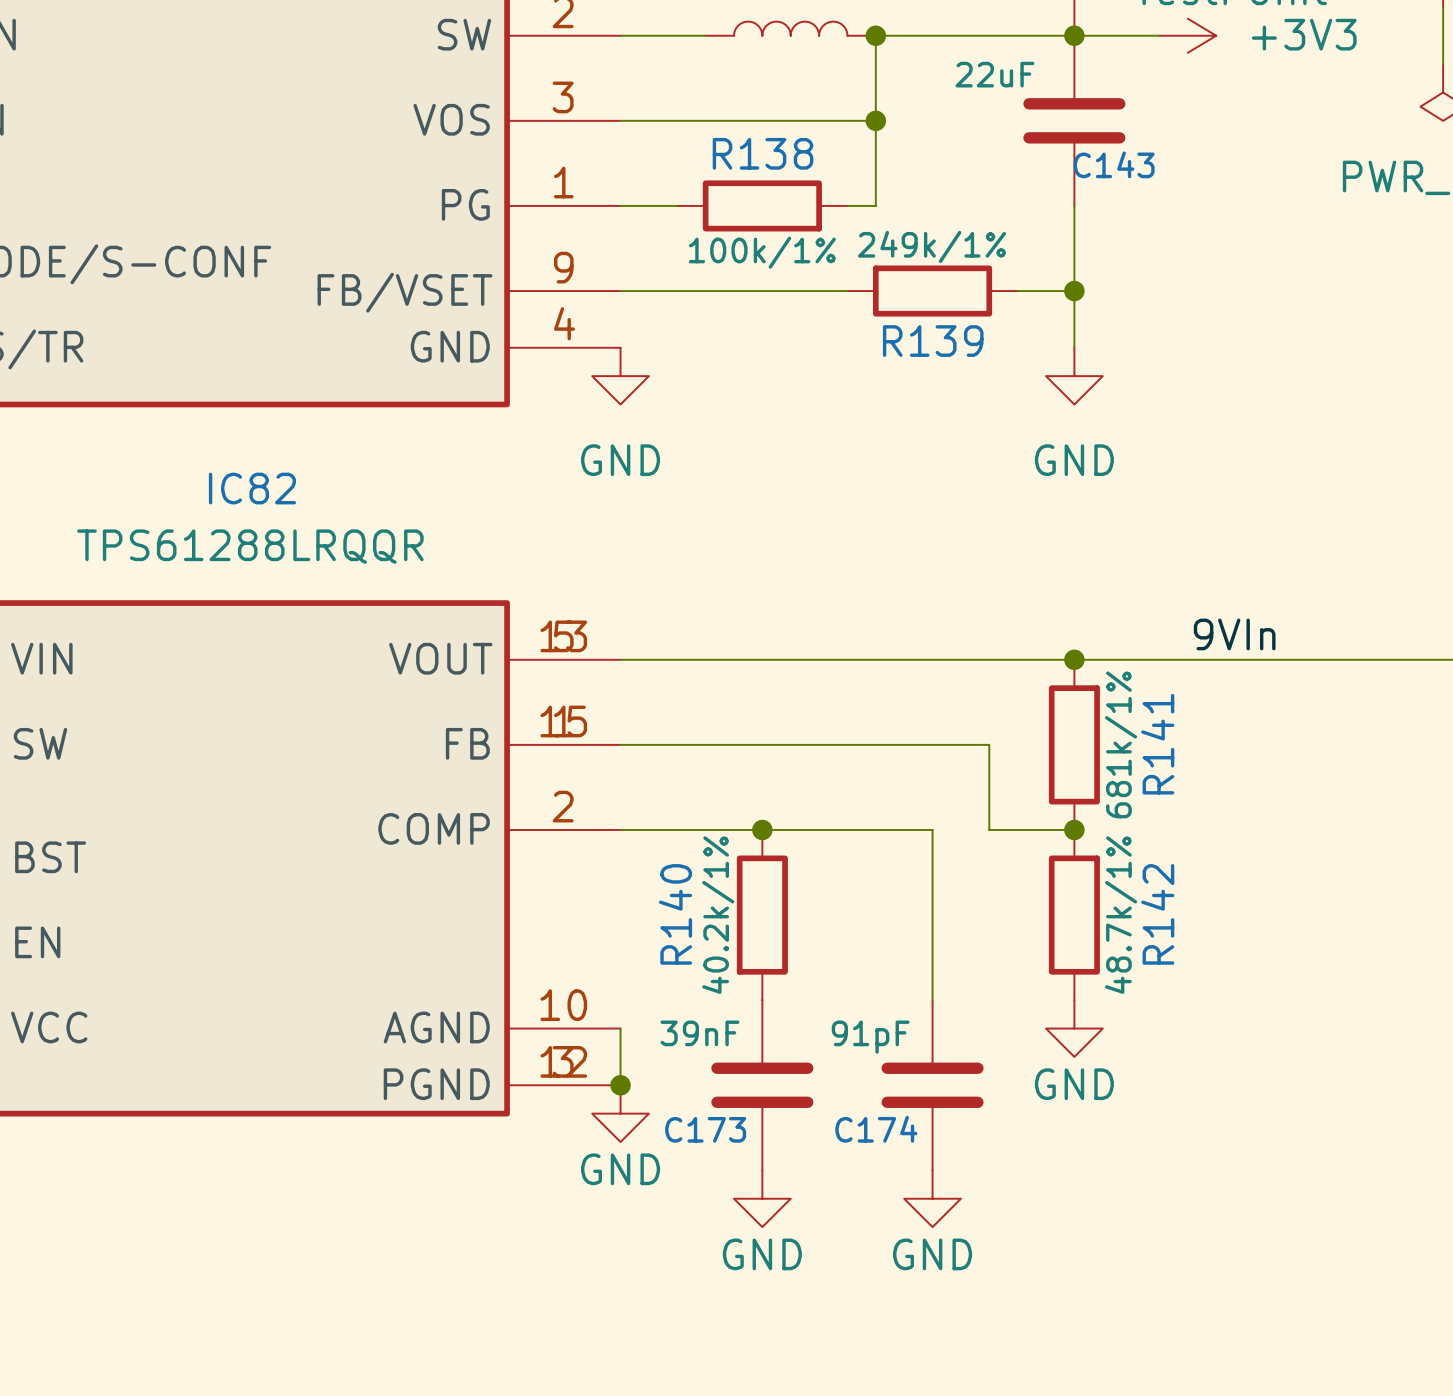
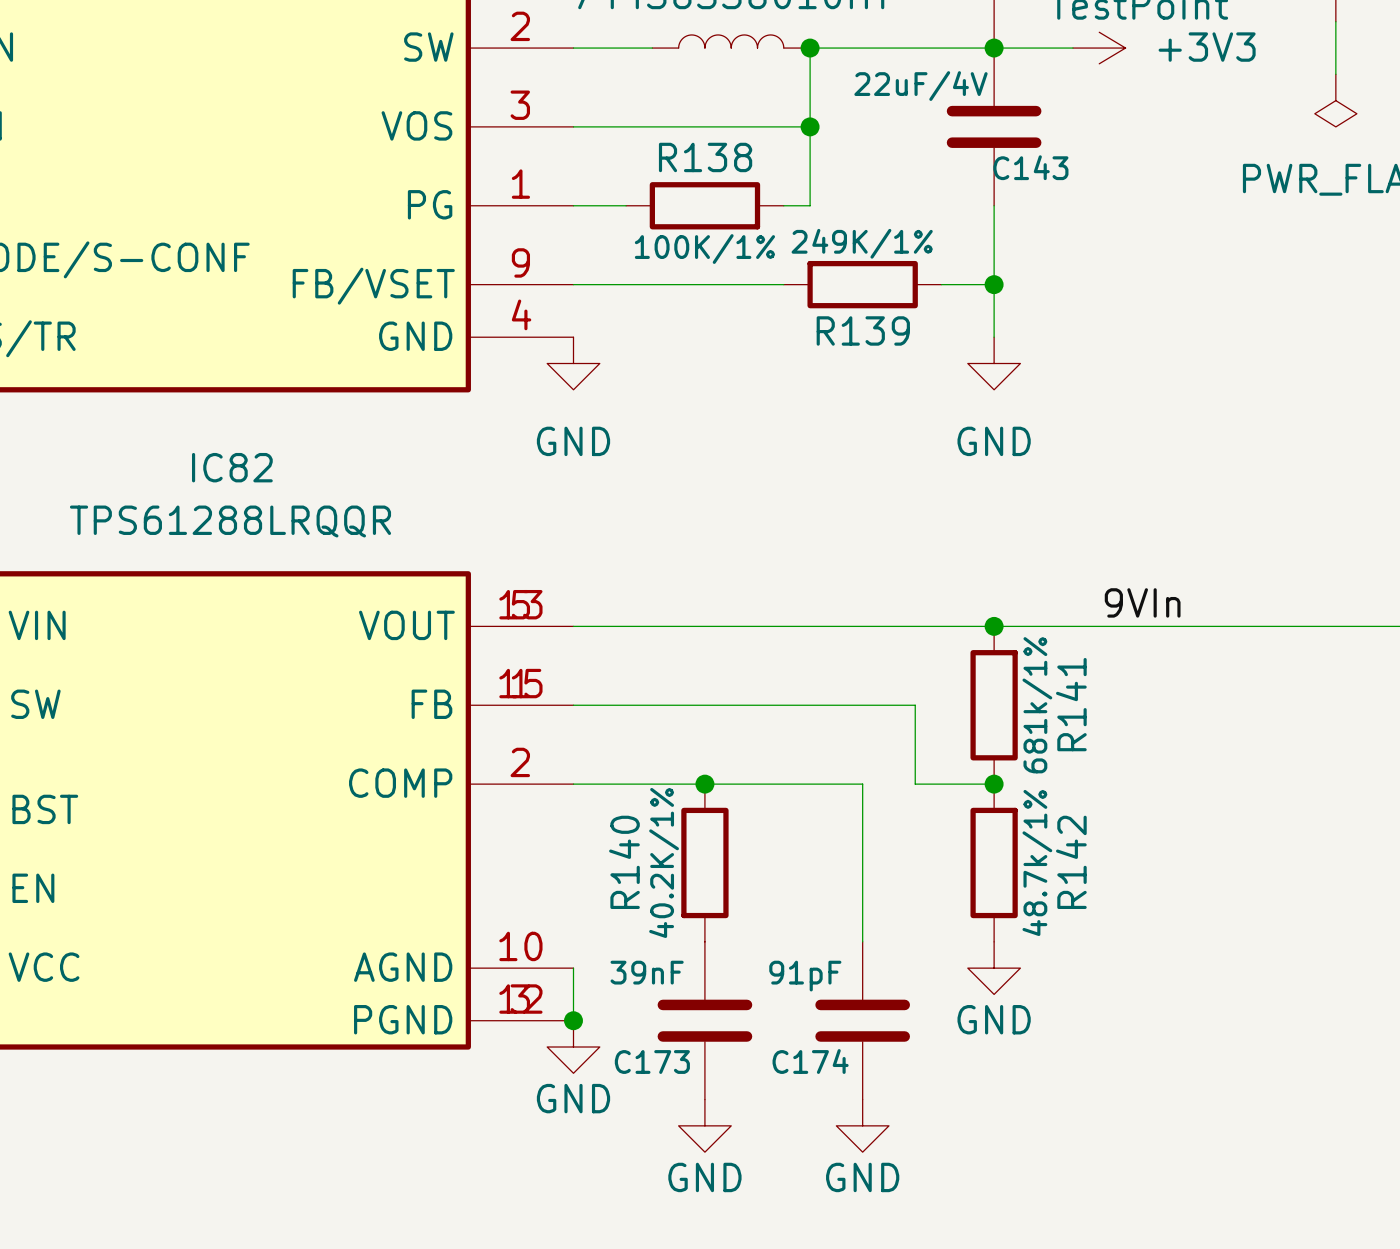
C143 value: 22uF (994, 74) -> 22uF/4V (920, 86)
R139 value: 249k/1% (932, 246) -> 249K/1% (862, 243)
R138 value: 100k/1% (762, 252) -> 100K/1% (704, 249)
R140 value: 40.2k/1% (718, 915) -> 40.2K/1% (664, 862)

